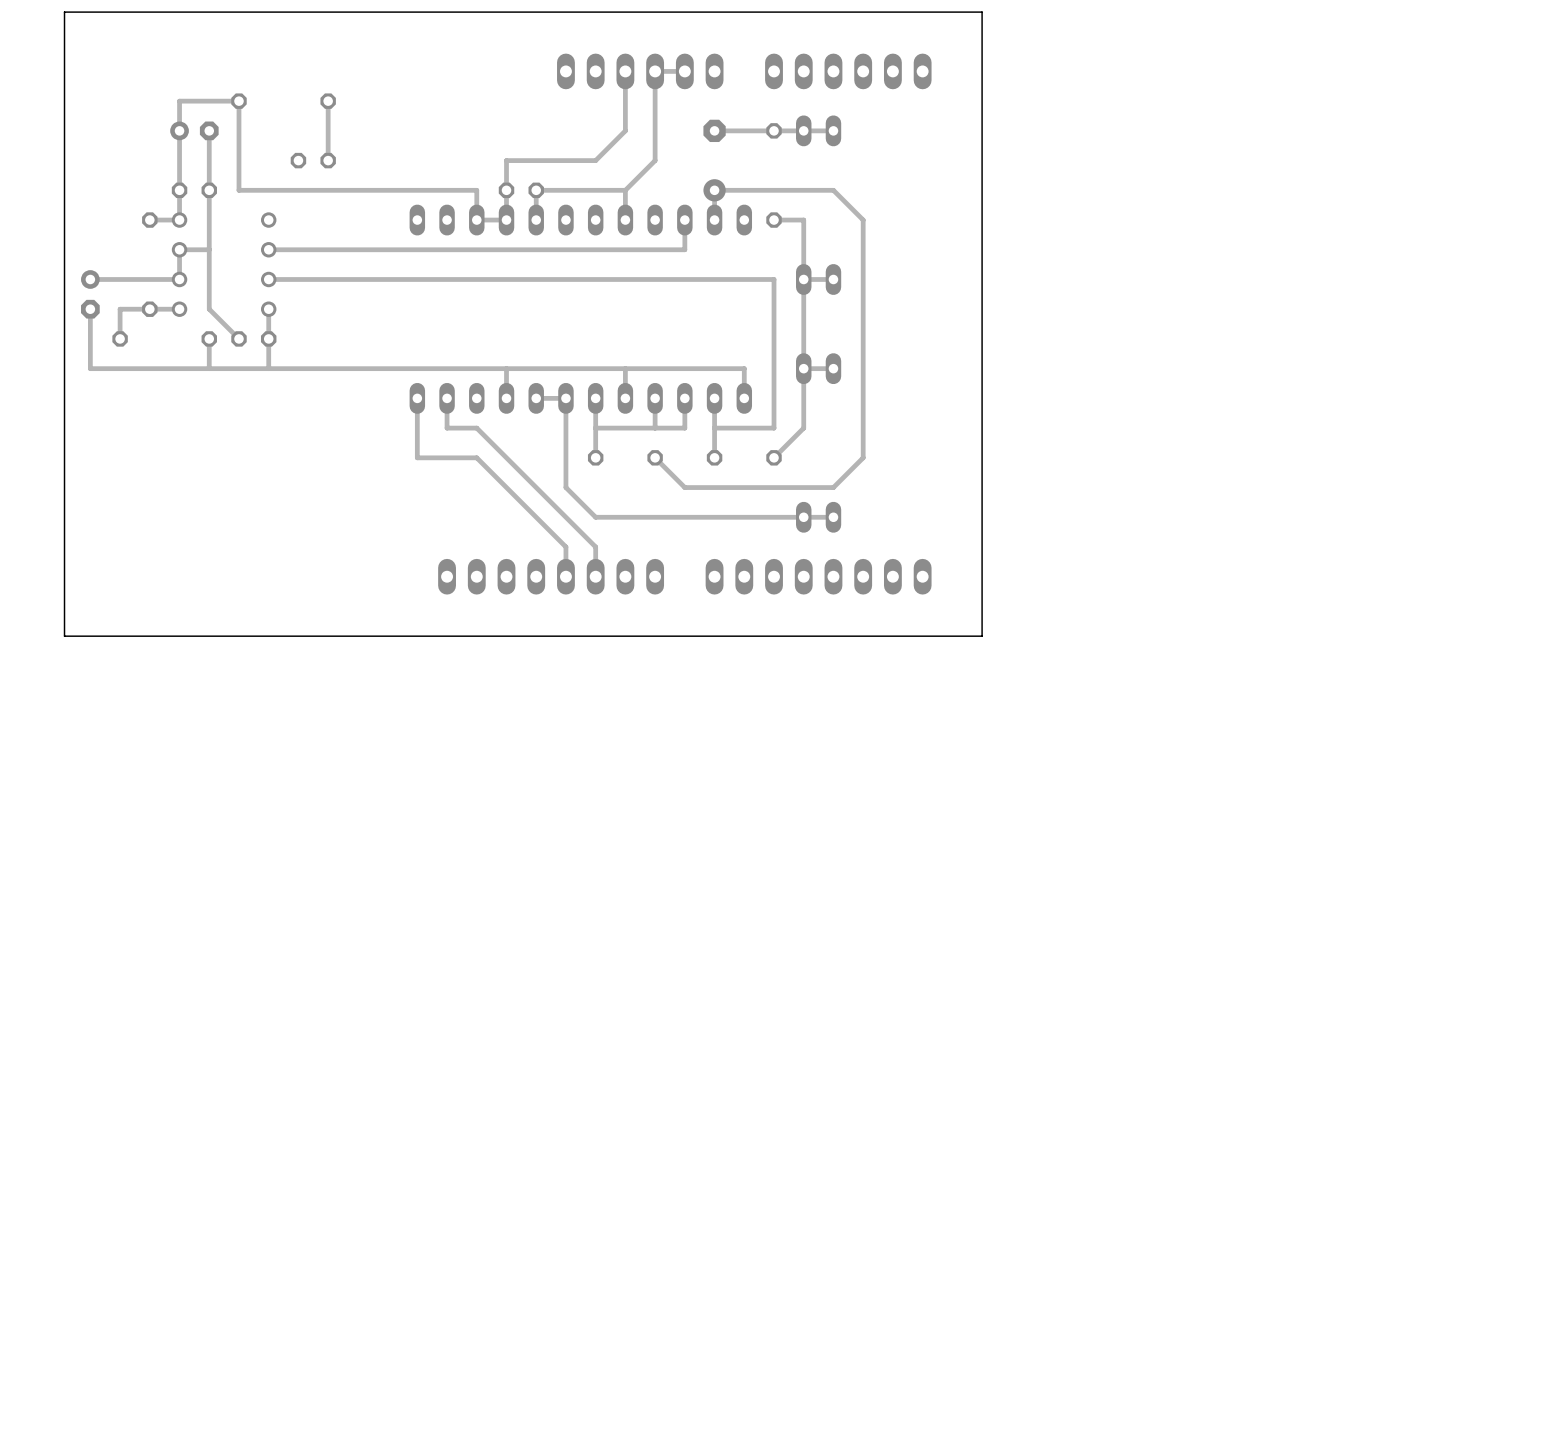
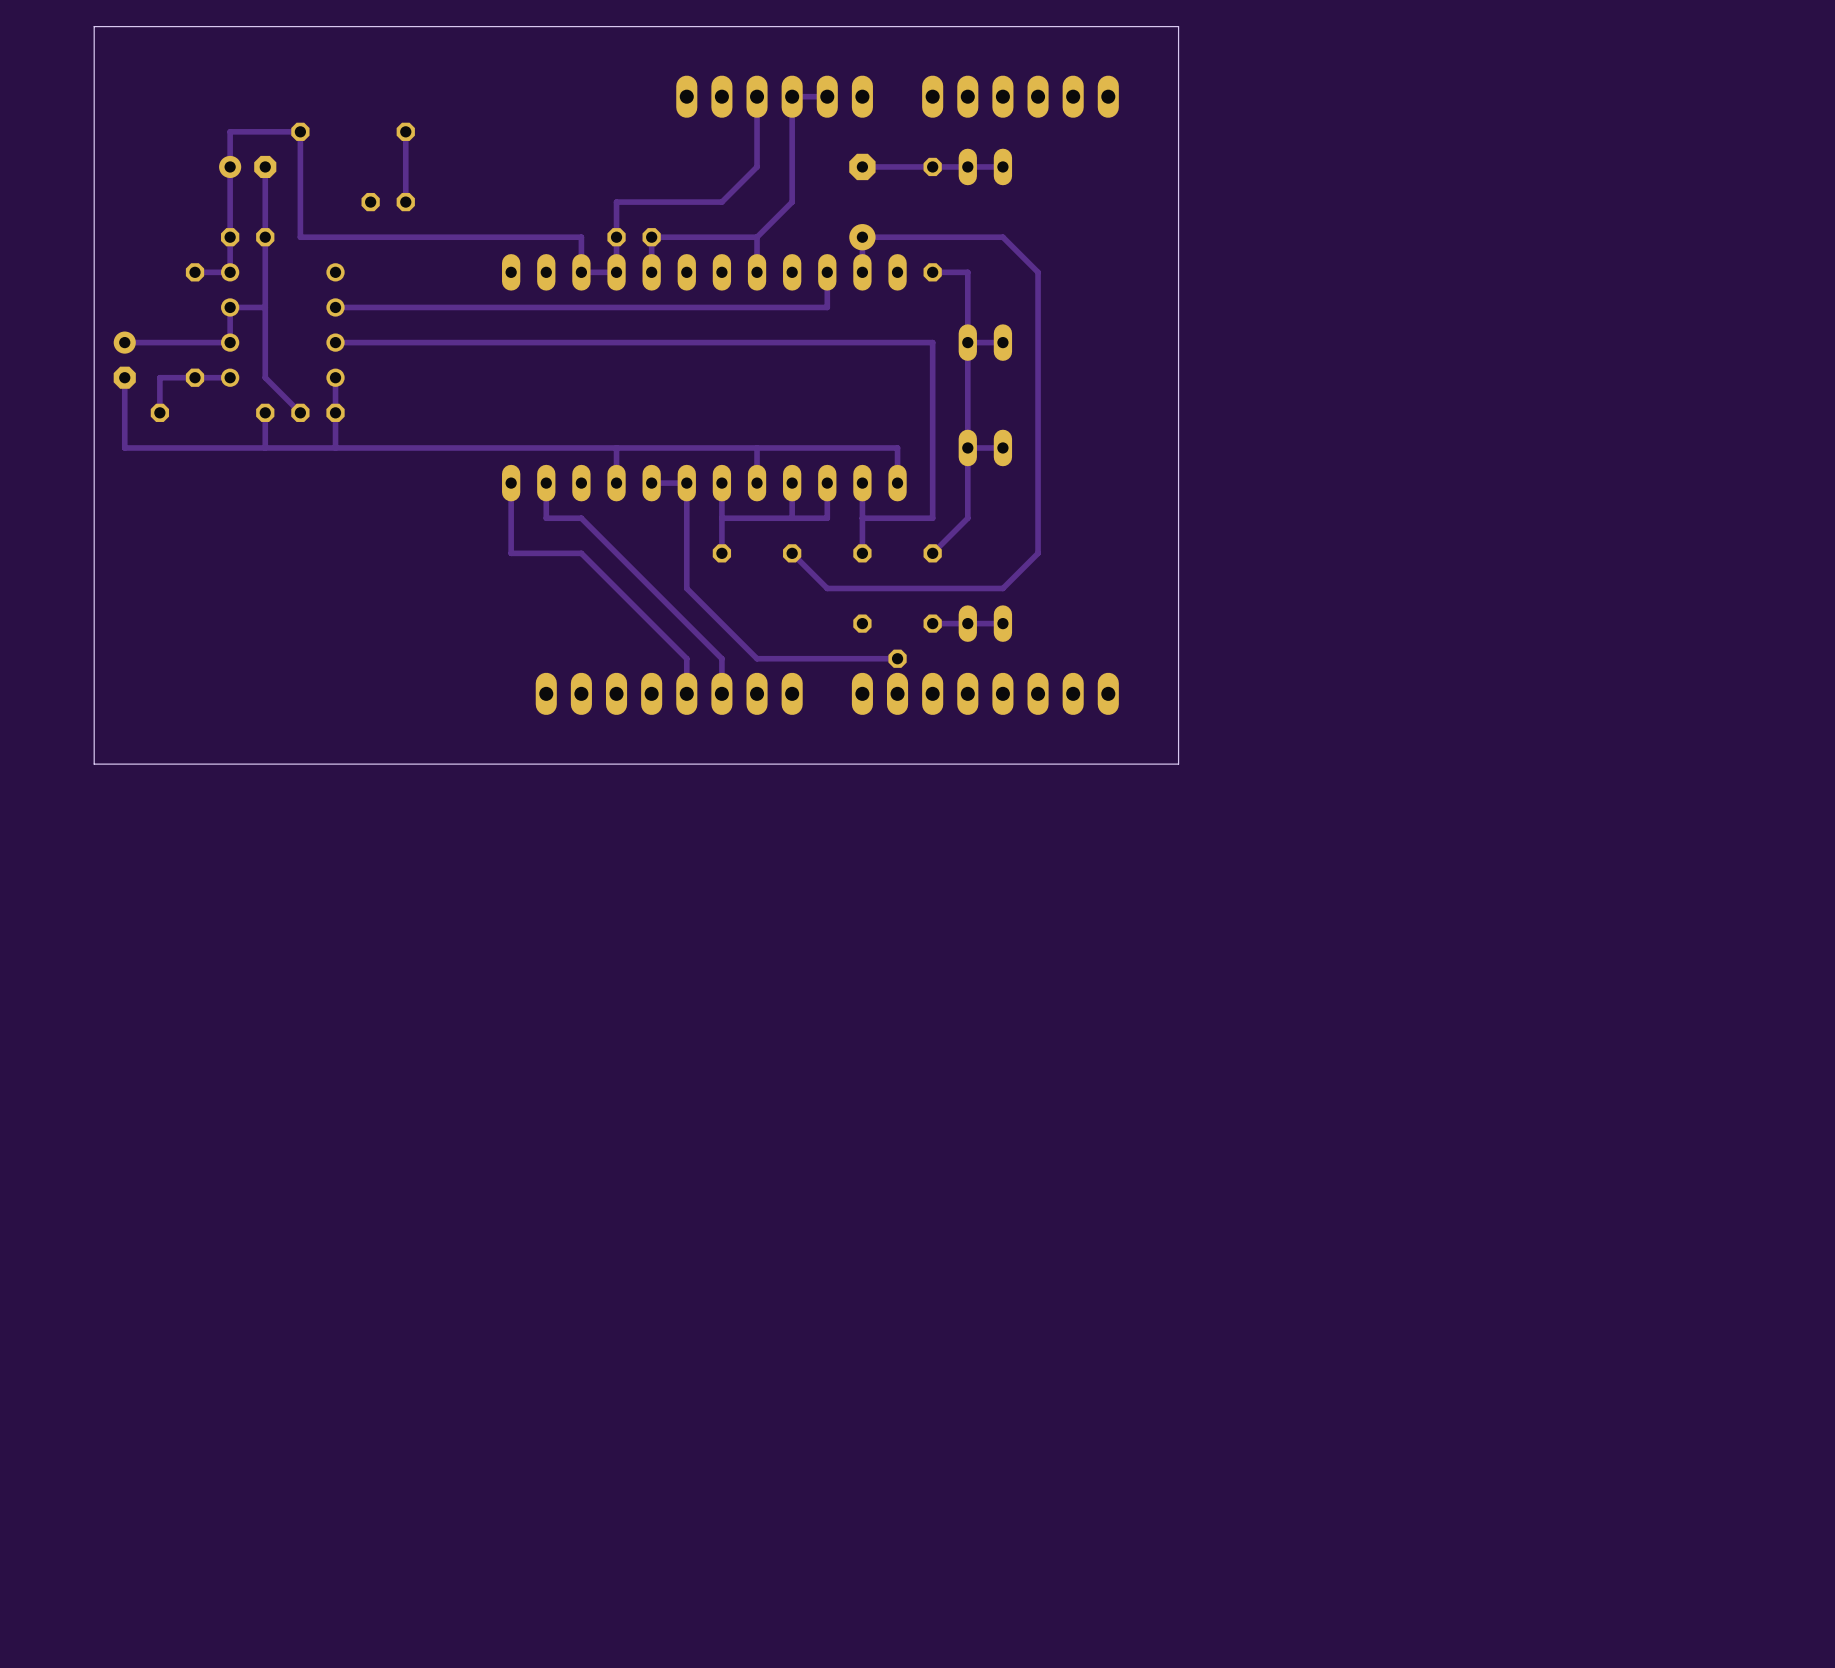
track: (774, 517) (595, 517) -> (897, 658) (757, 658) (721, 623)
part: none -> (897, 641)

